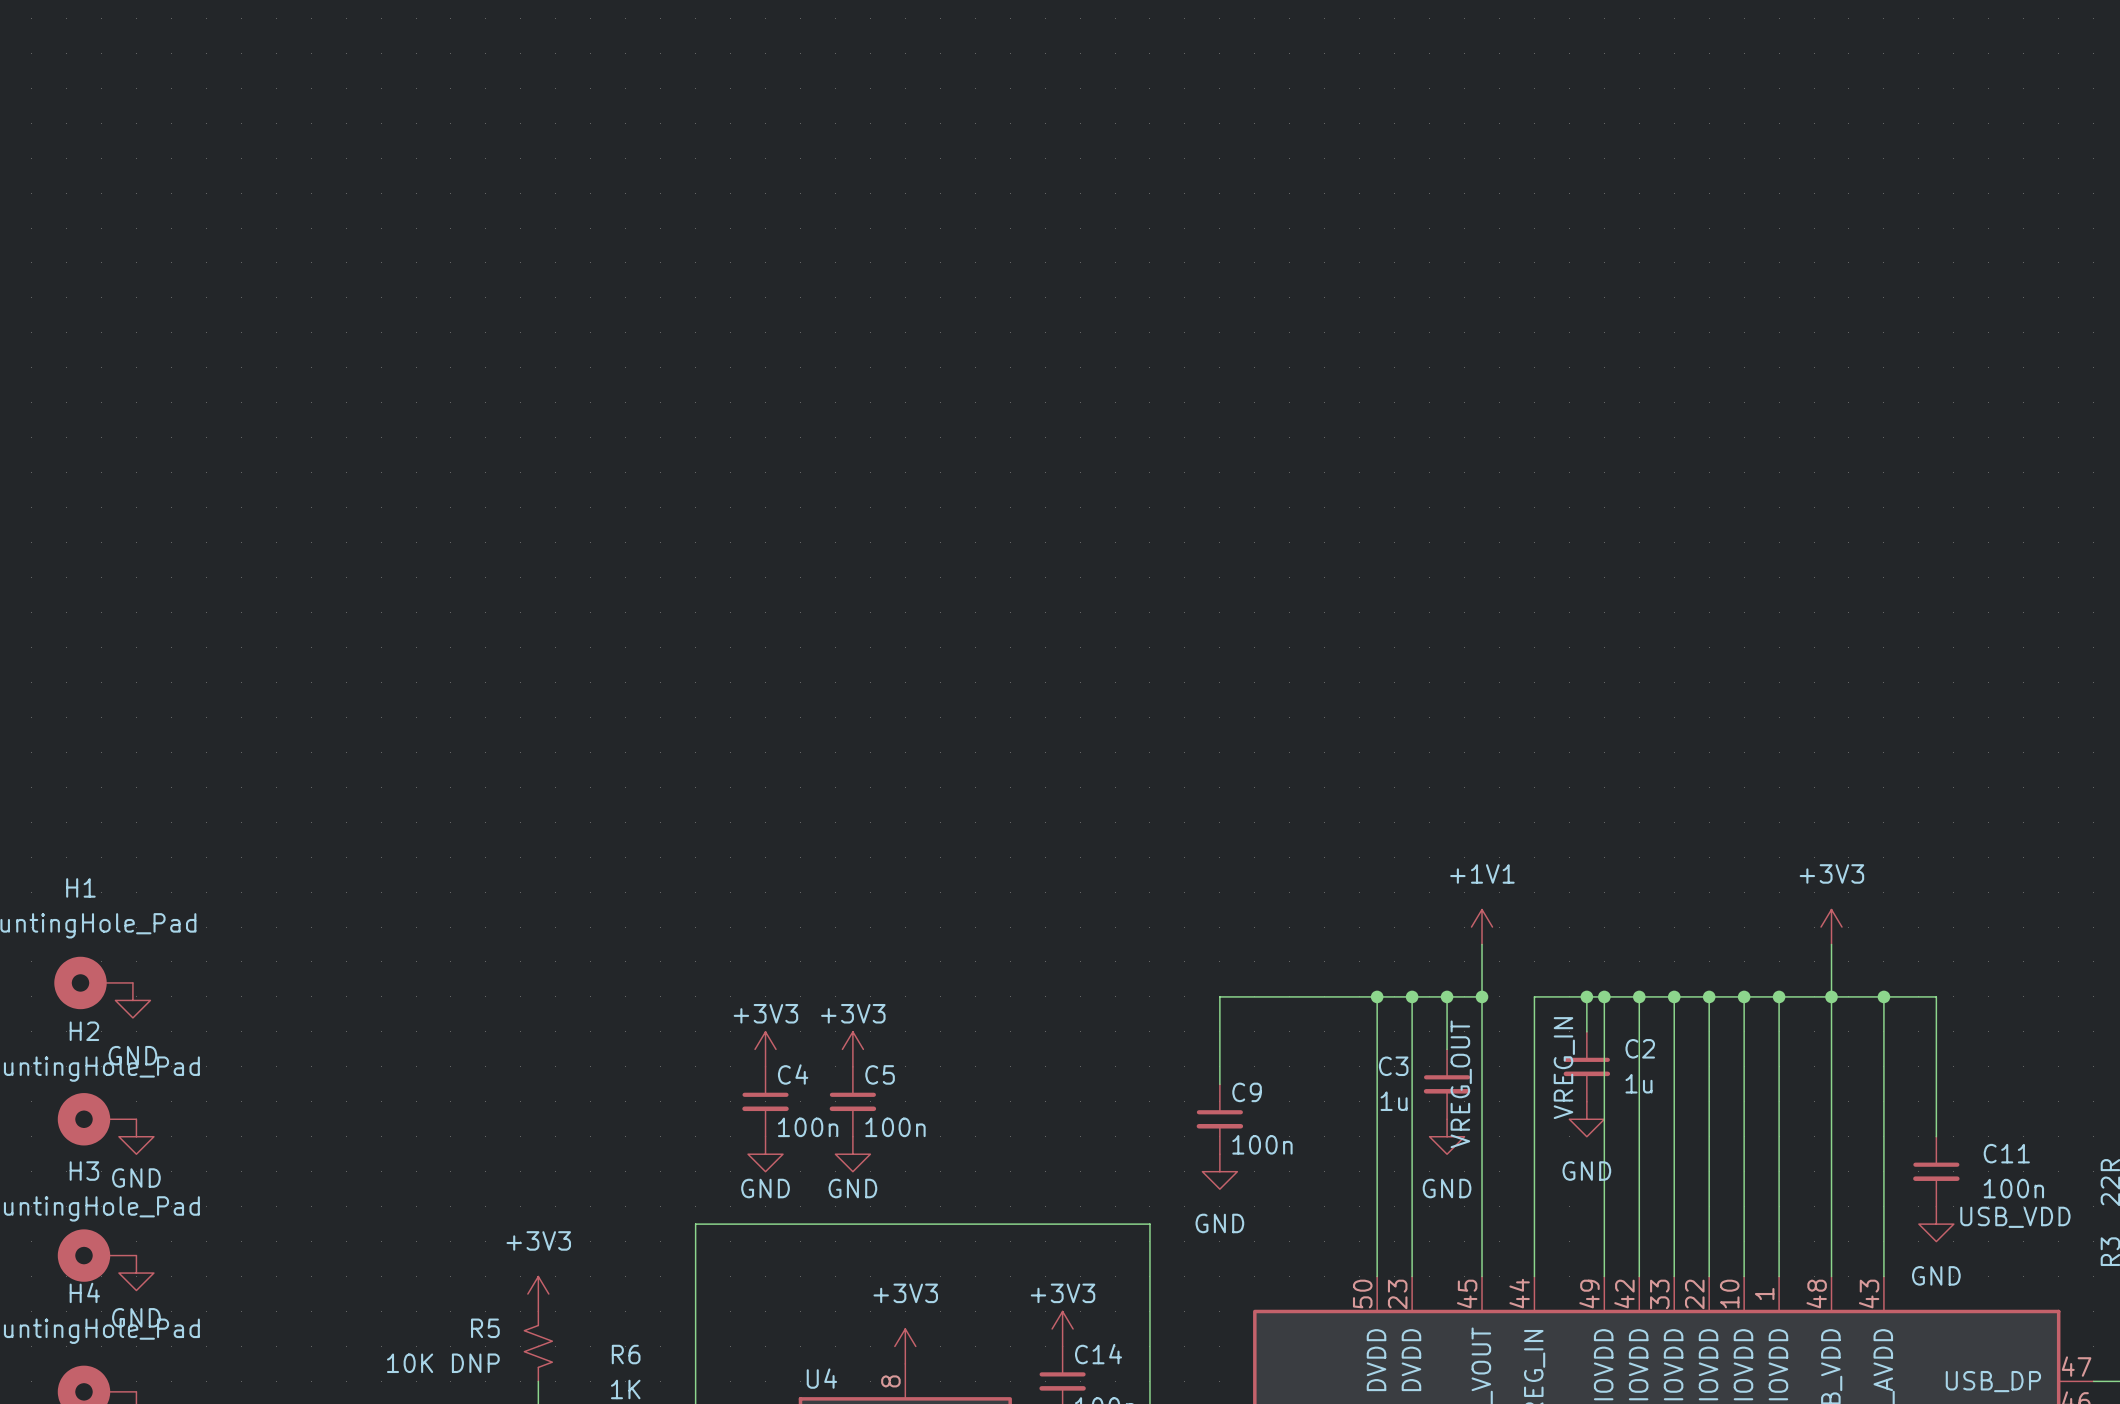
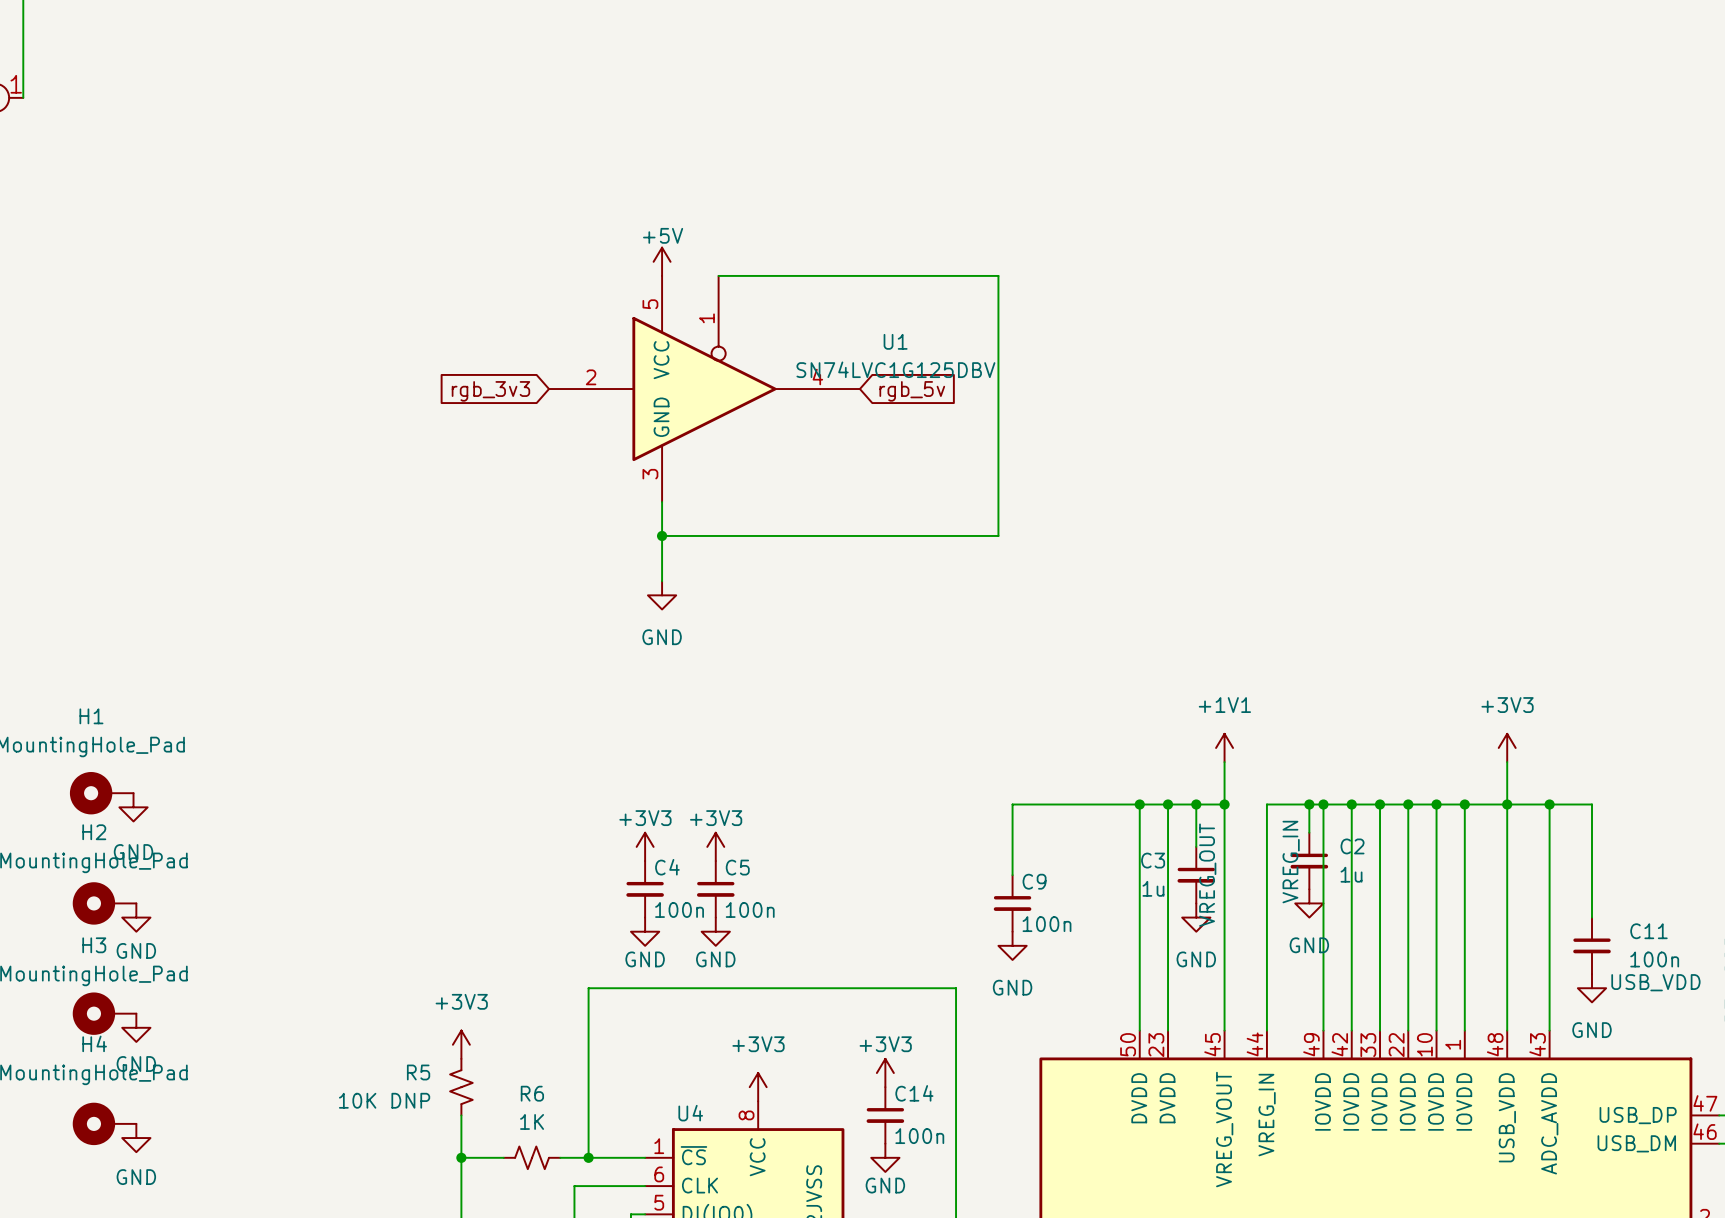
power symbol: none -> +5V (662, 261)
wire: none -> (718, 275) (998, 275) (998, 535) (662, 535)
U1: none -> SN74LVC1G125DBV (704, 389)
global label: none -> rgb_3v3 (490, 391)
global label: none -> rgb_5v (912, 391)
wire: none -> (662, 502) (662, 581)
junction: none -> (662, 535)
power symbol: none -> GND (662, 595)

